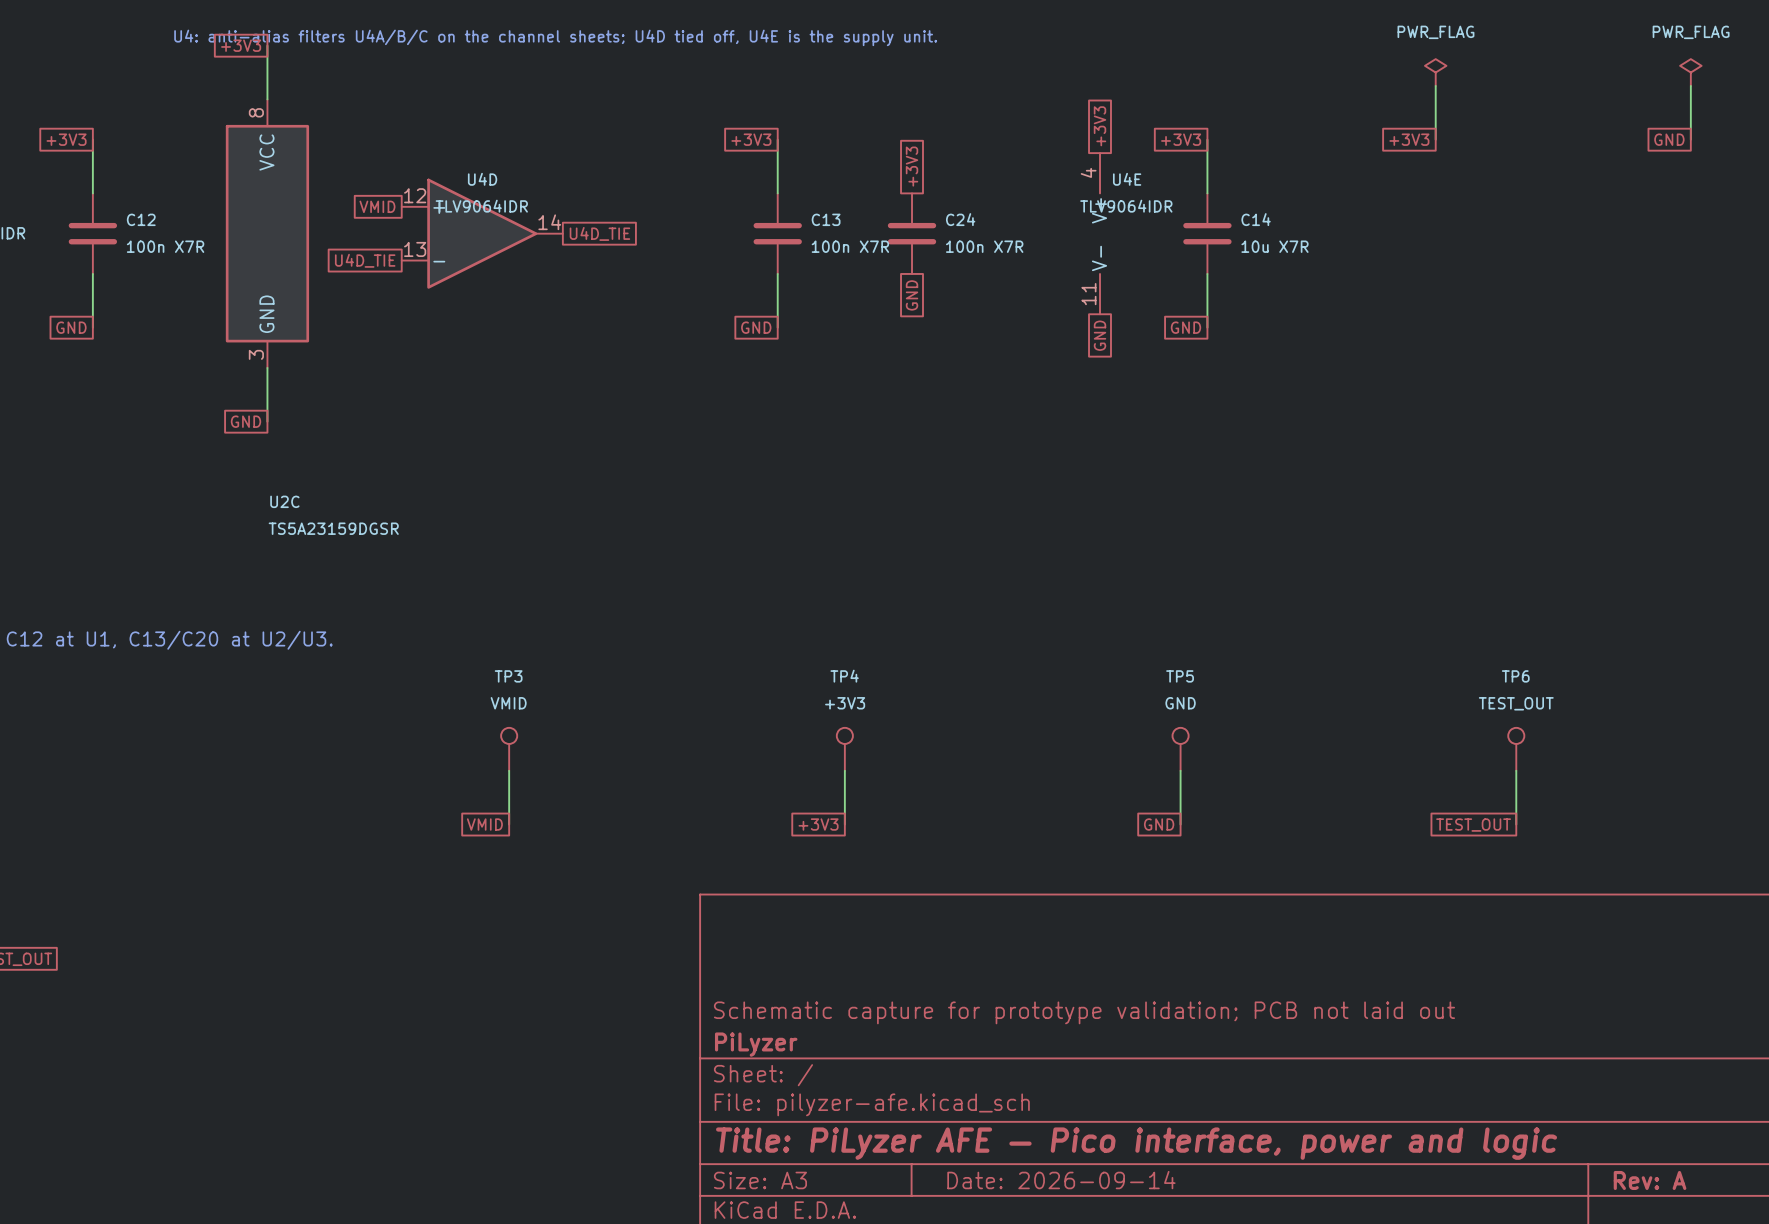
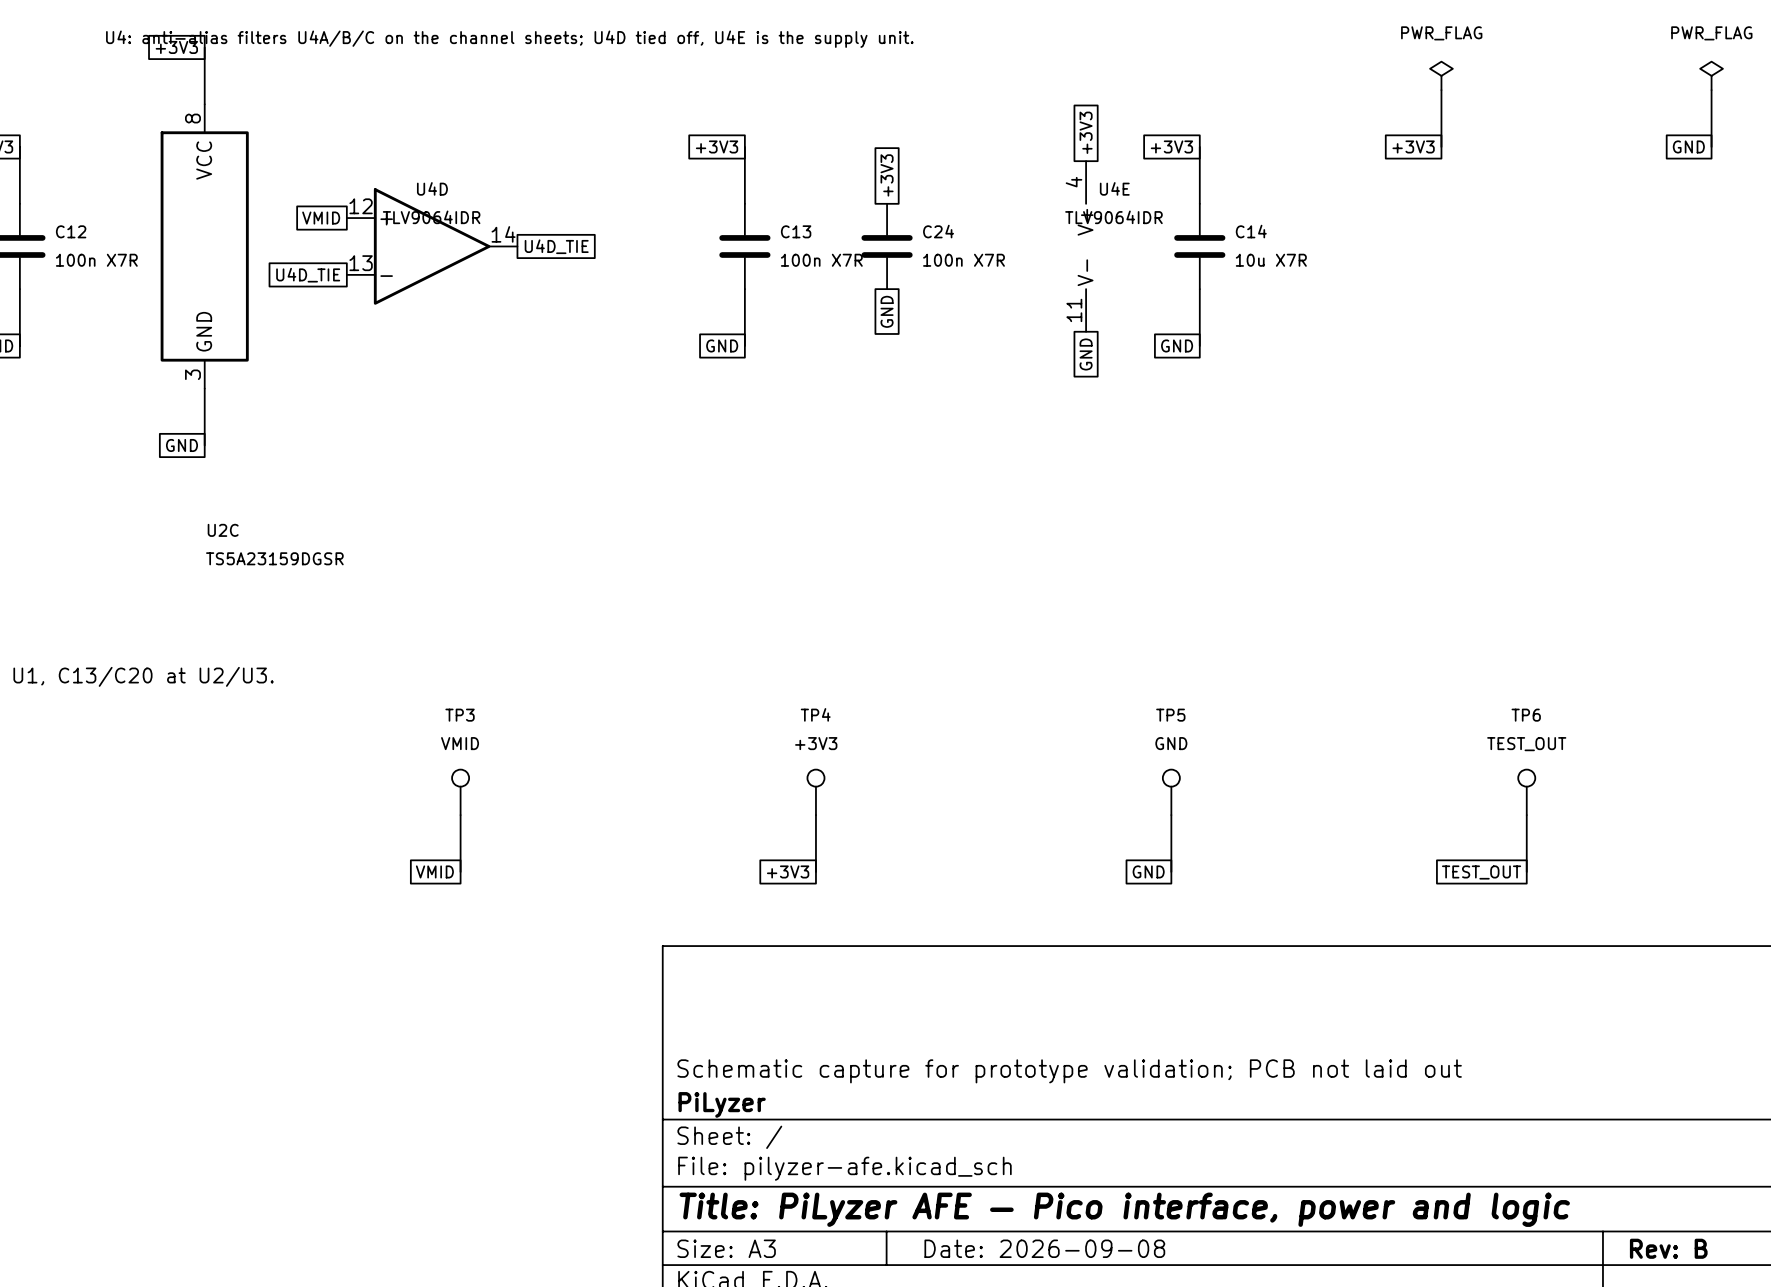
title block: Date: 2026-09-14 (1061, 1180) -> Date: 2026-09-08 (1044, 1248)
title block: Rev: A (1650, 1180) -> Rev: B (1668, 1248)

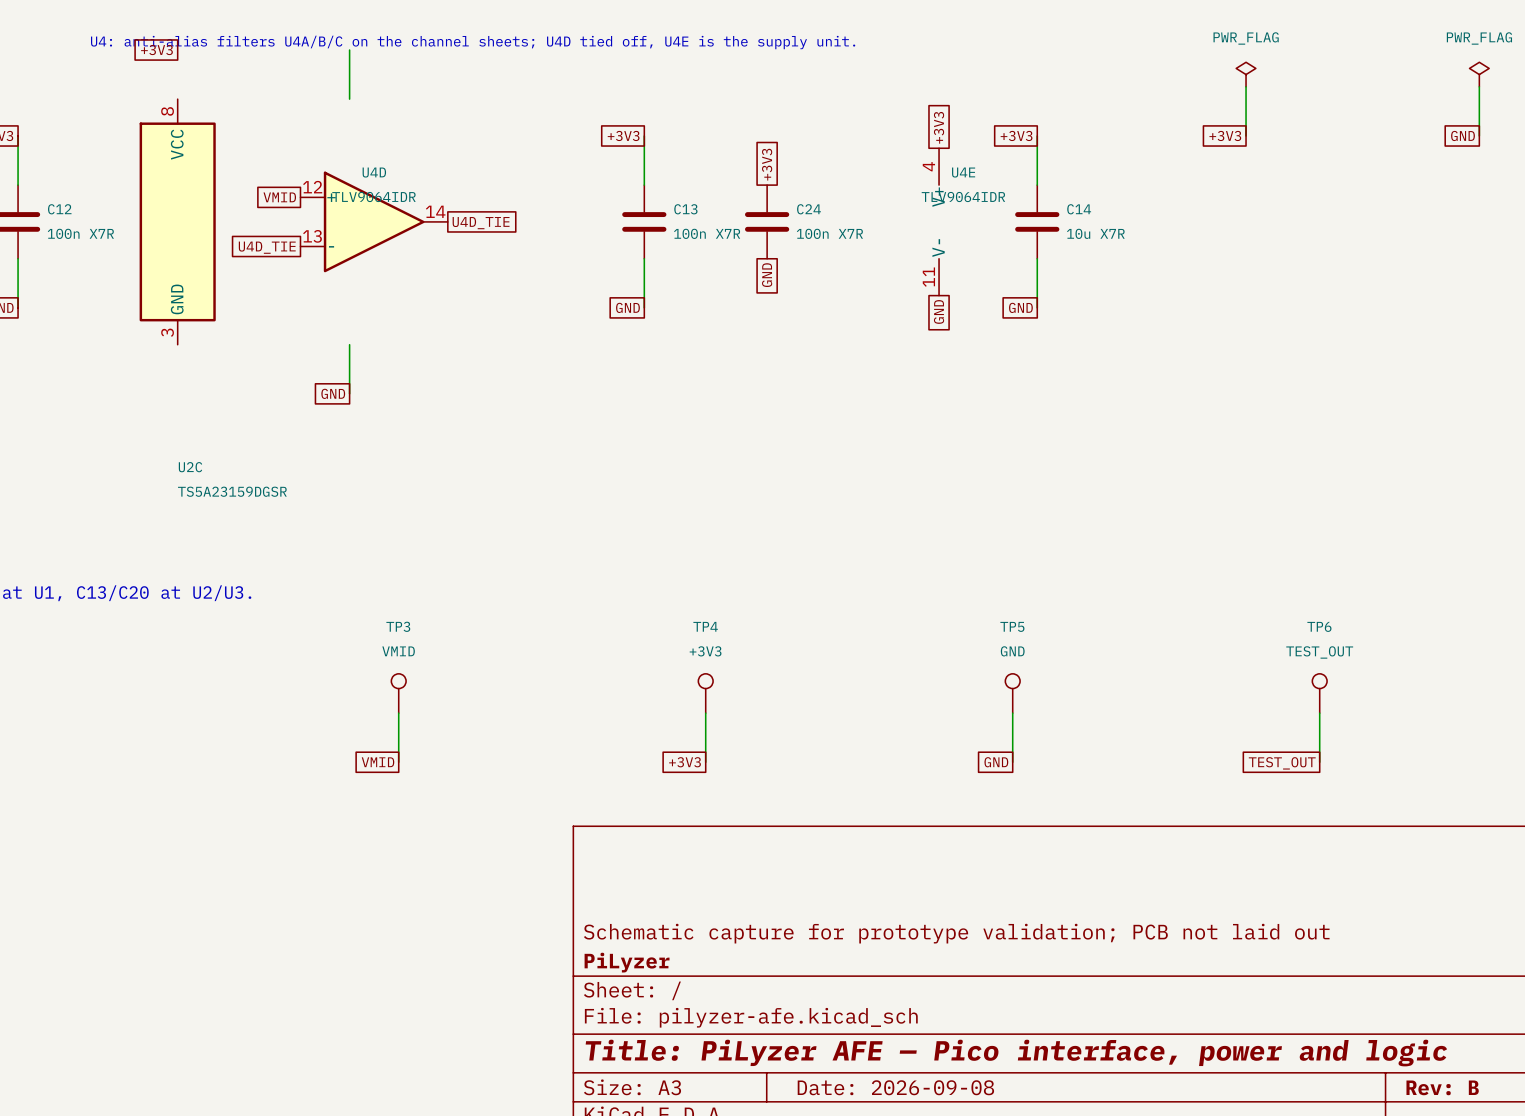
wire: (204, 47) (204, 104) -> (349, 50) (349, 99)
wire: (204, 388) (204, 445) -> (349, 344) (349, 393)
global label position: GND (181, 445) -> GND (333, 393)

